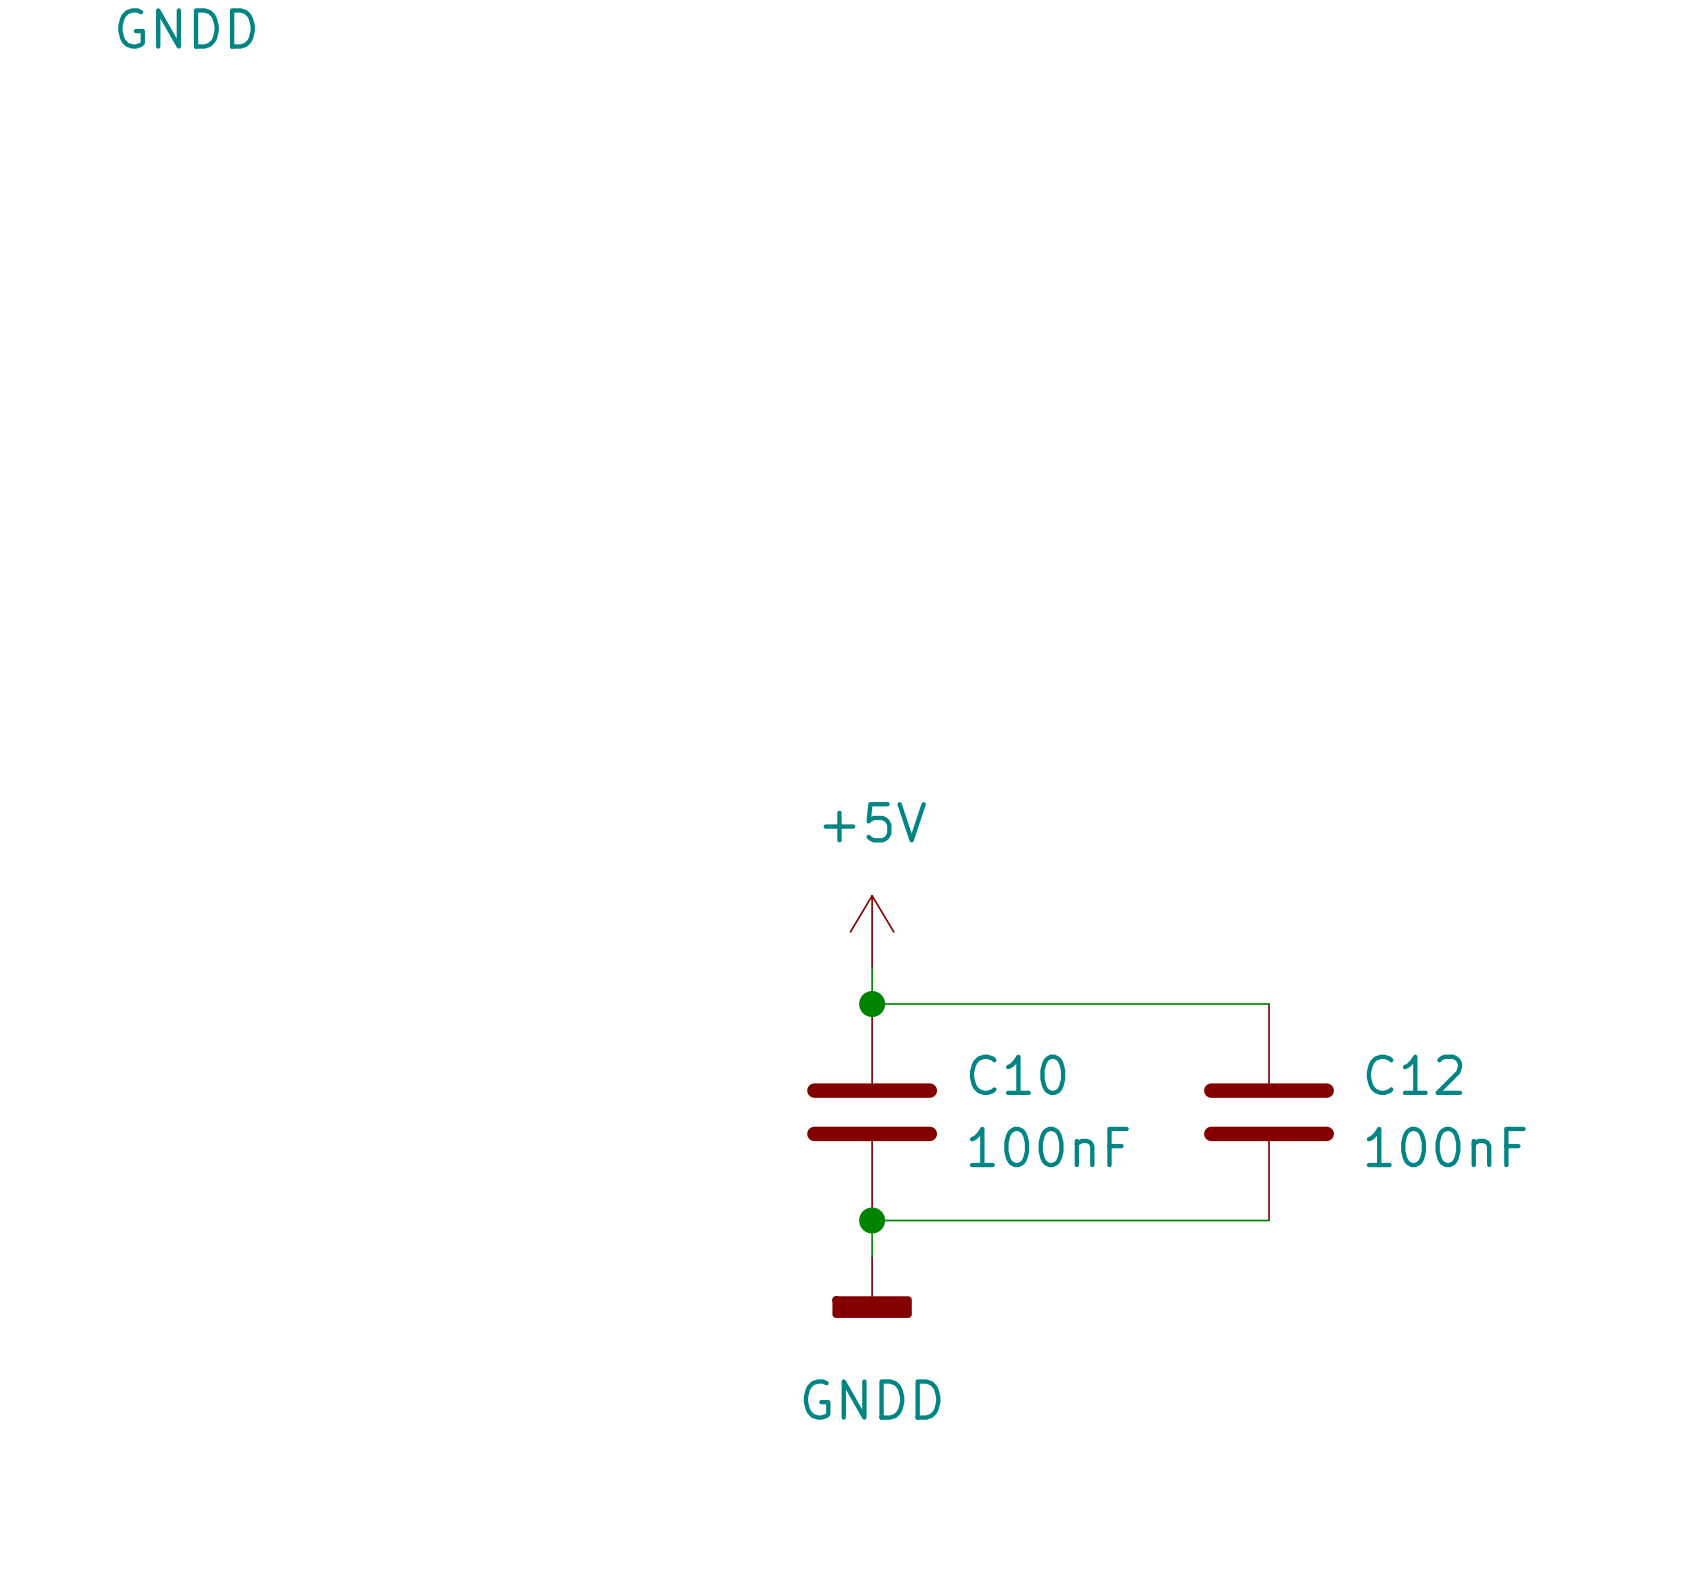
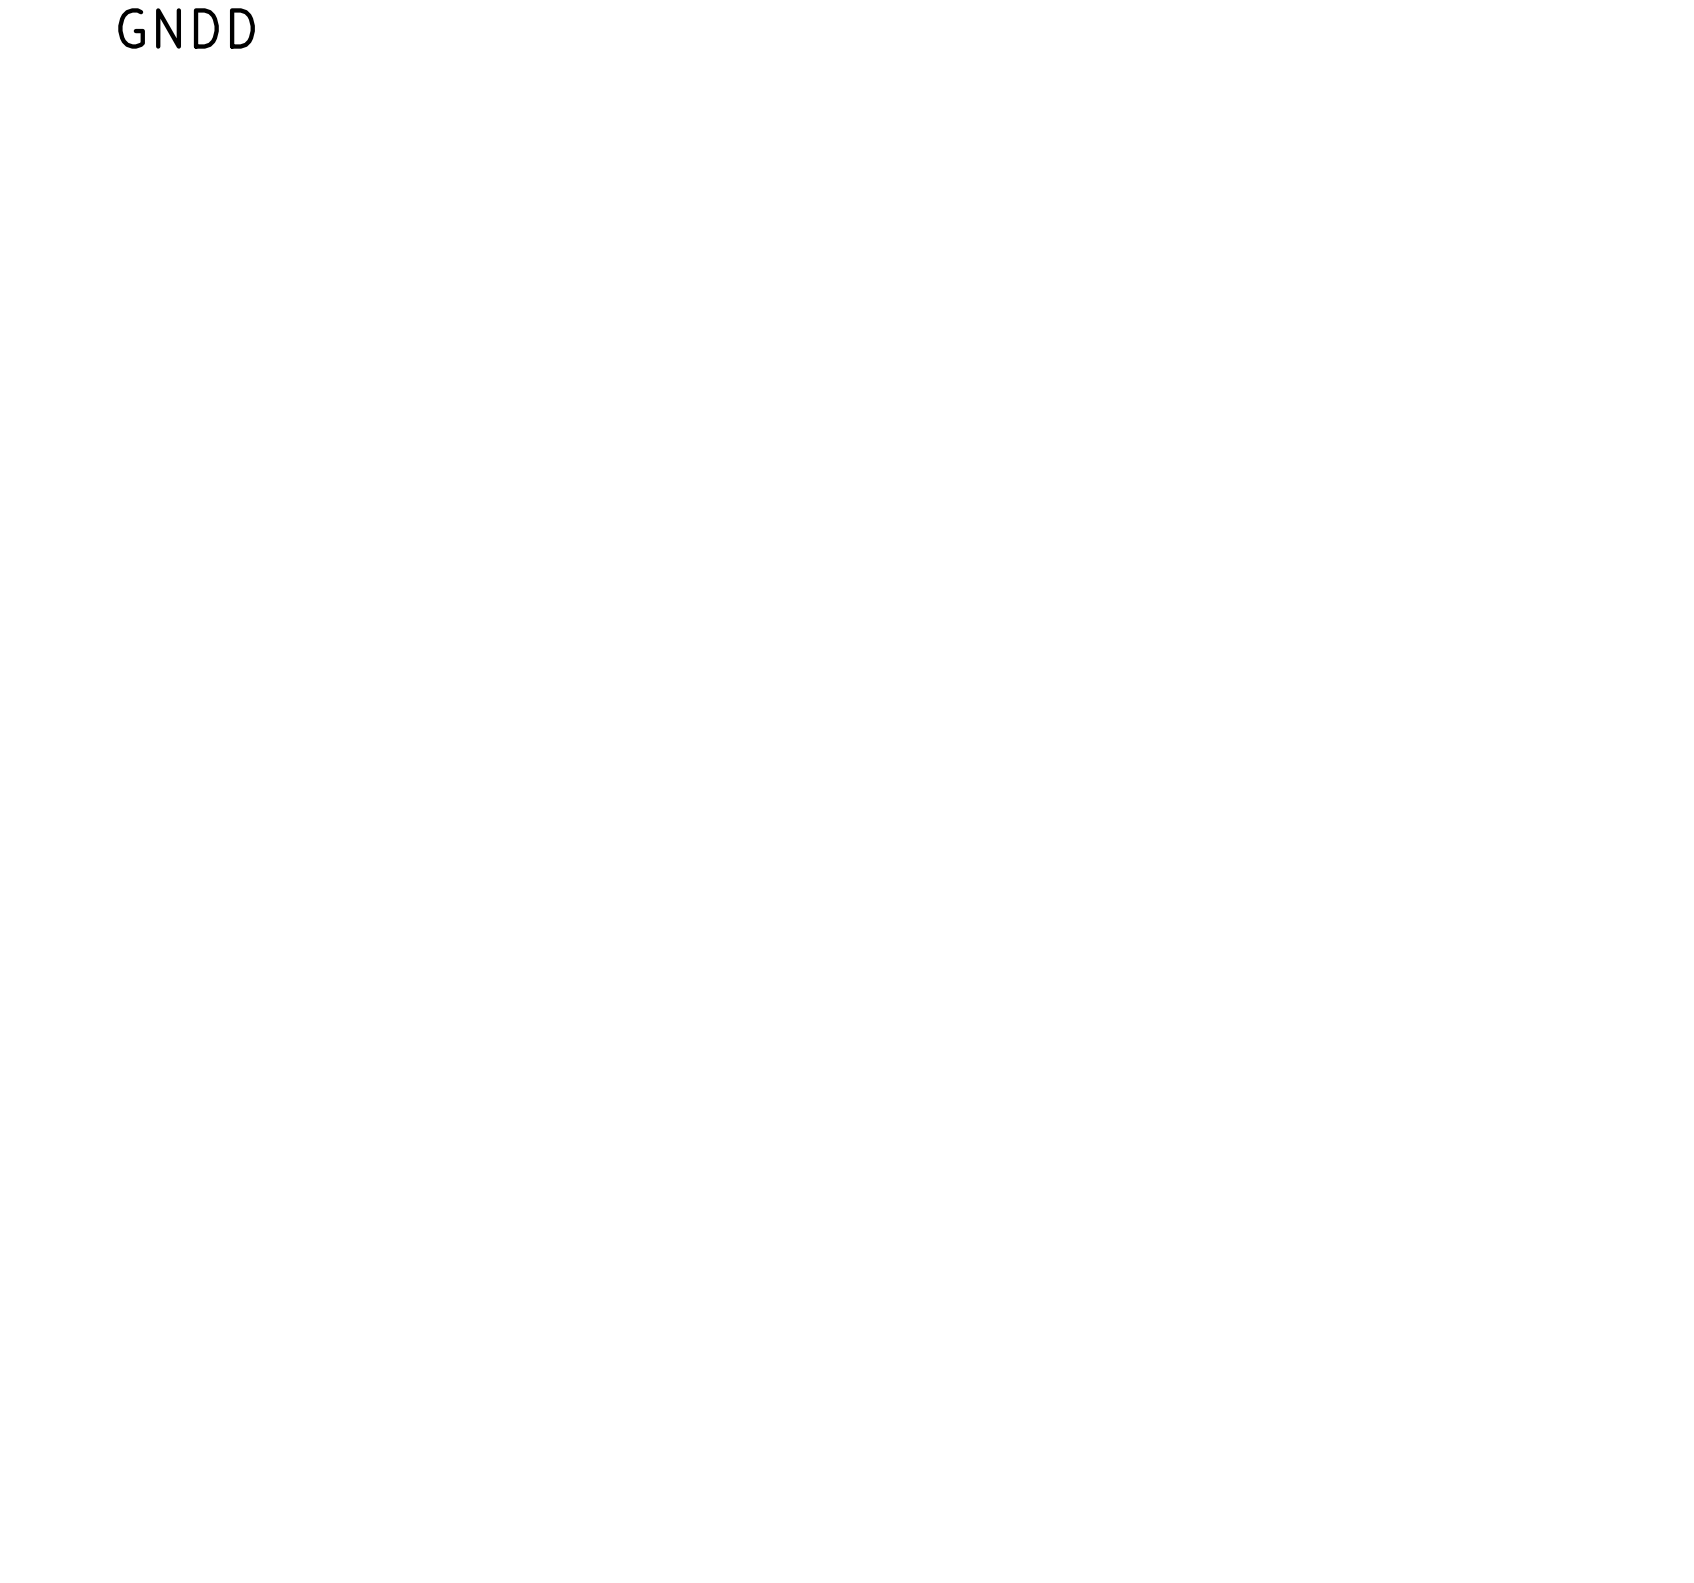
power symbol: +5V (872, 931) -> none
wire: (872, 967) (872, 1004) (1269, 1004) -> none
junction: (872, 1004) -> none
C10: 100nF (872, 1112) -> none
C12: 100nF (1269, 1112) -> none
junction: (872, 1220) -> none
wire: (1269, 1220) (872, 1220) (872, 1256) -> none
power symbol: GNDD (872, 1287) -> none

